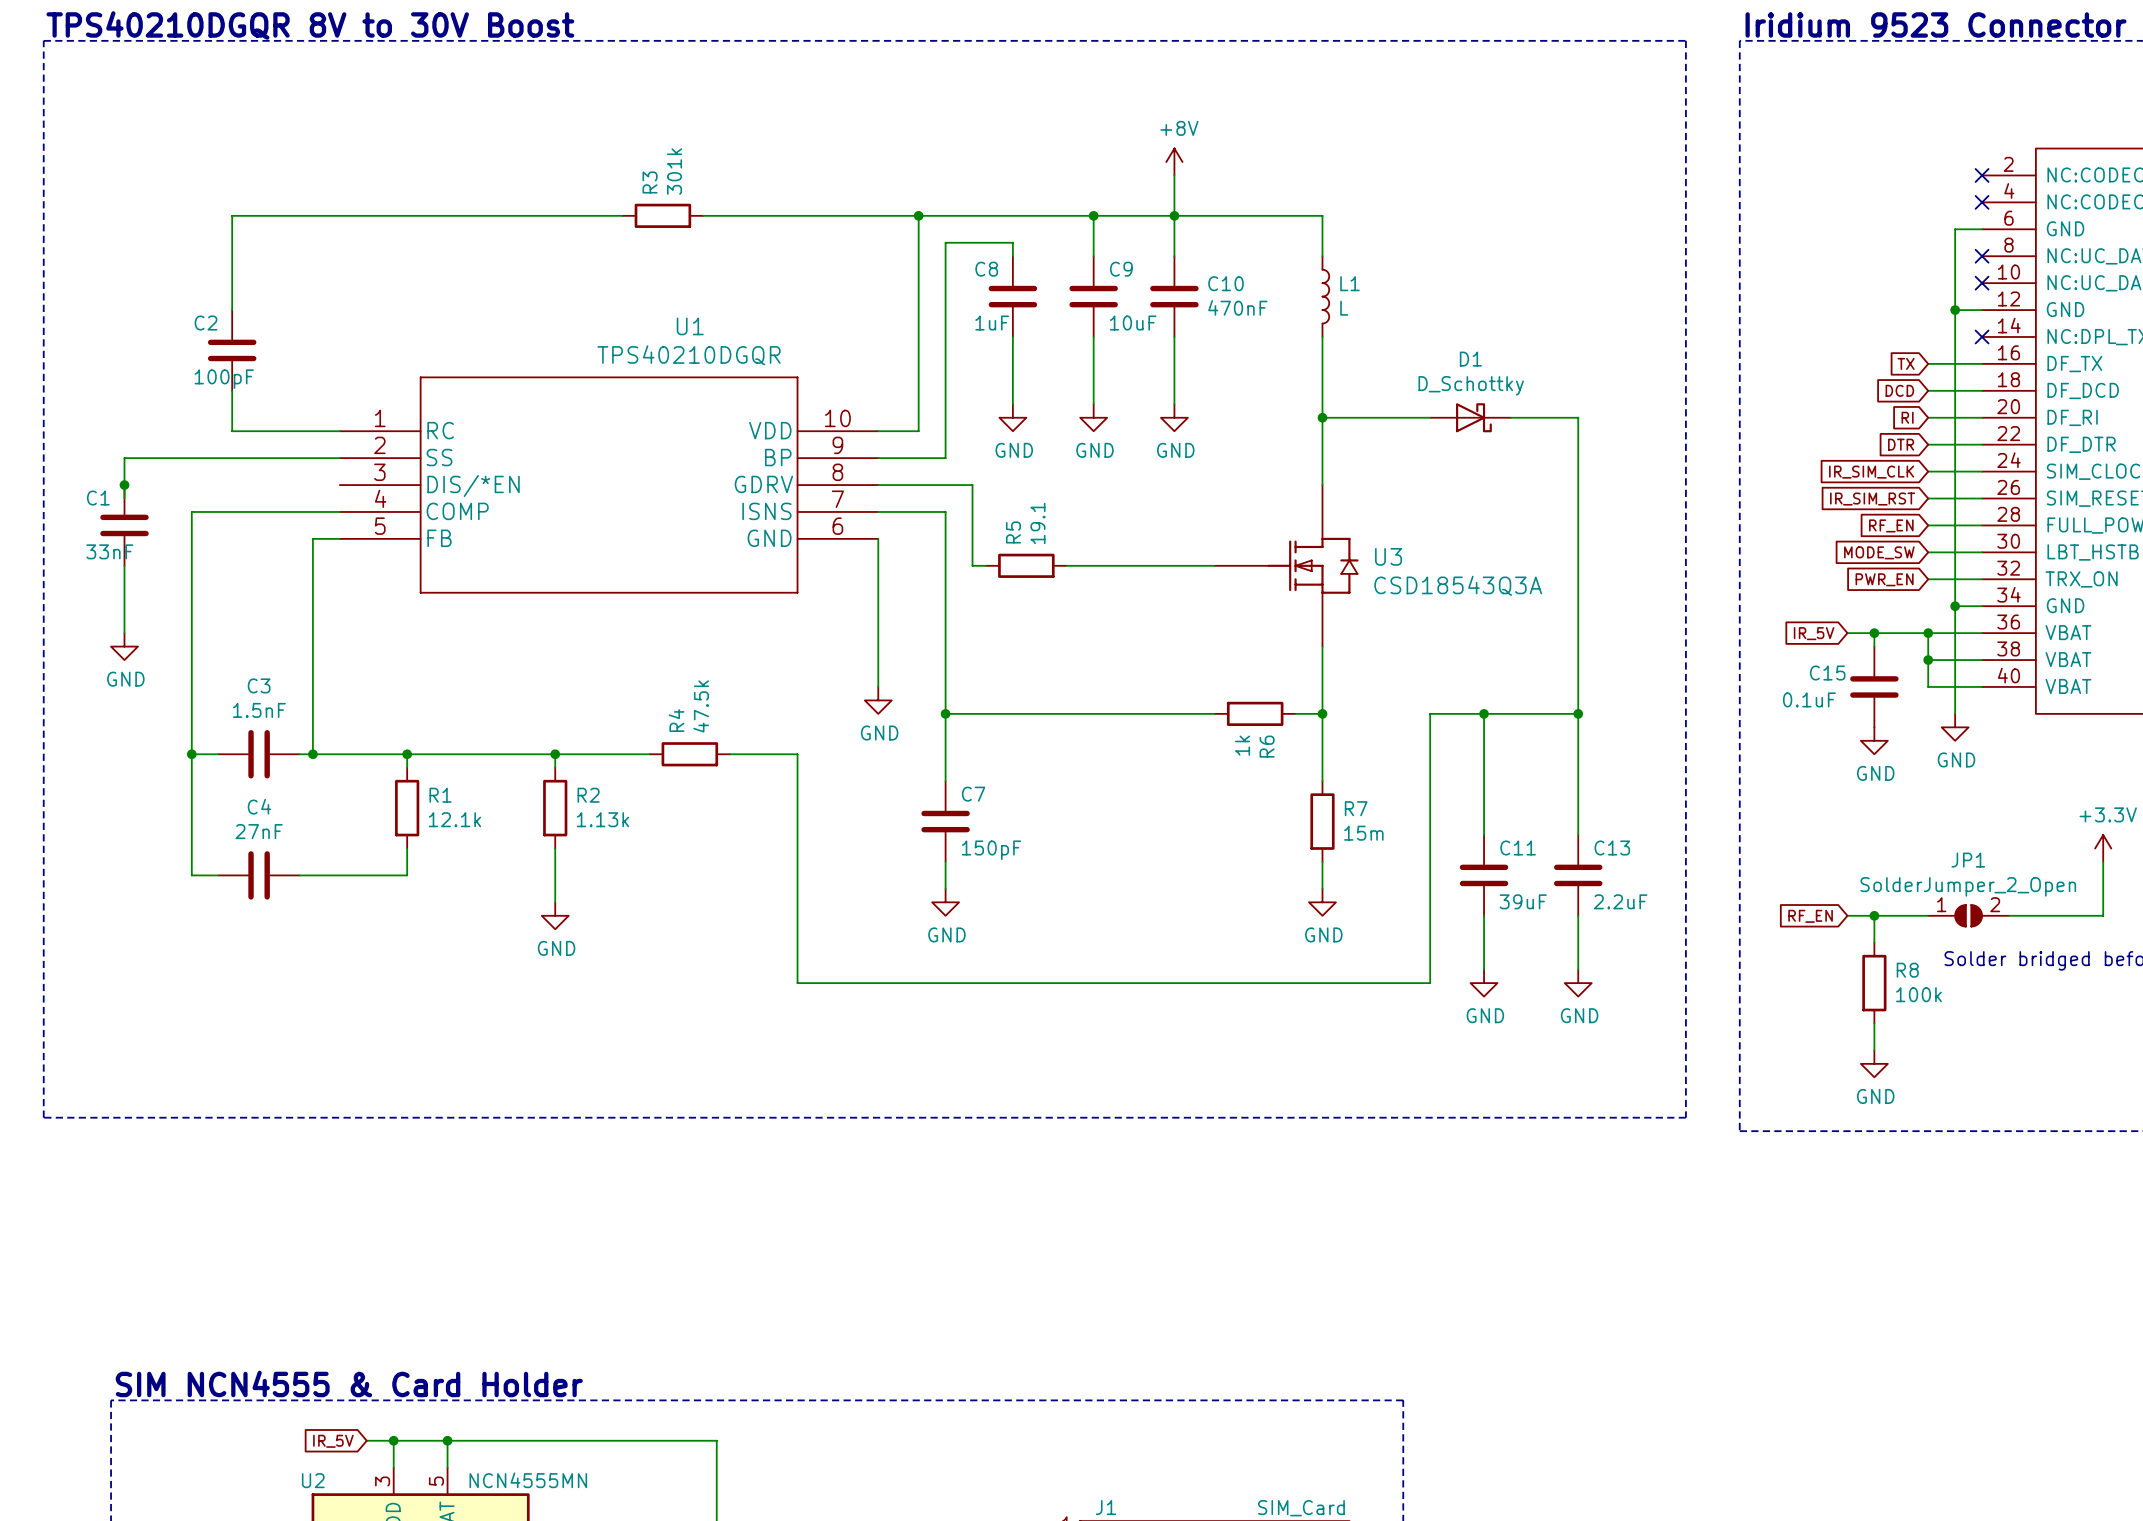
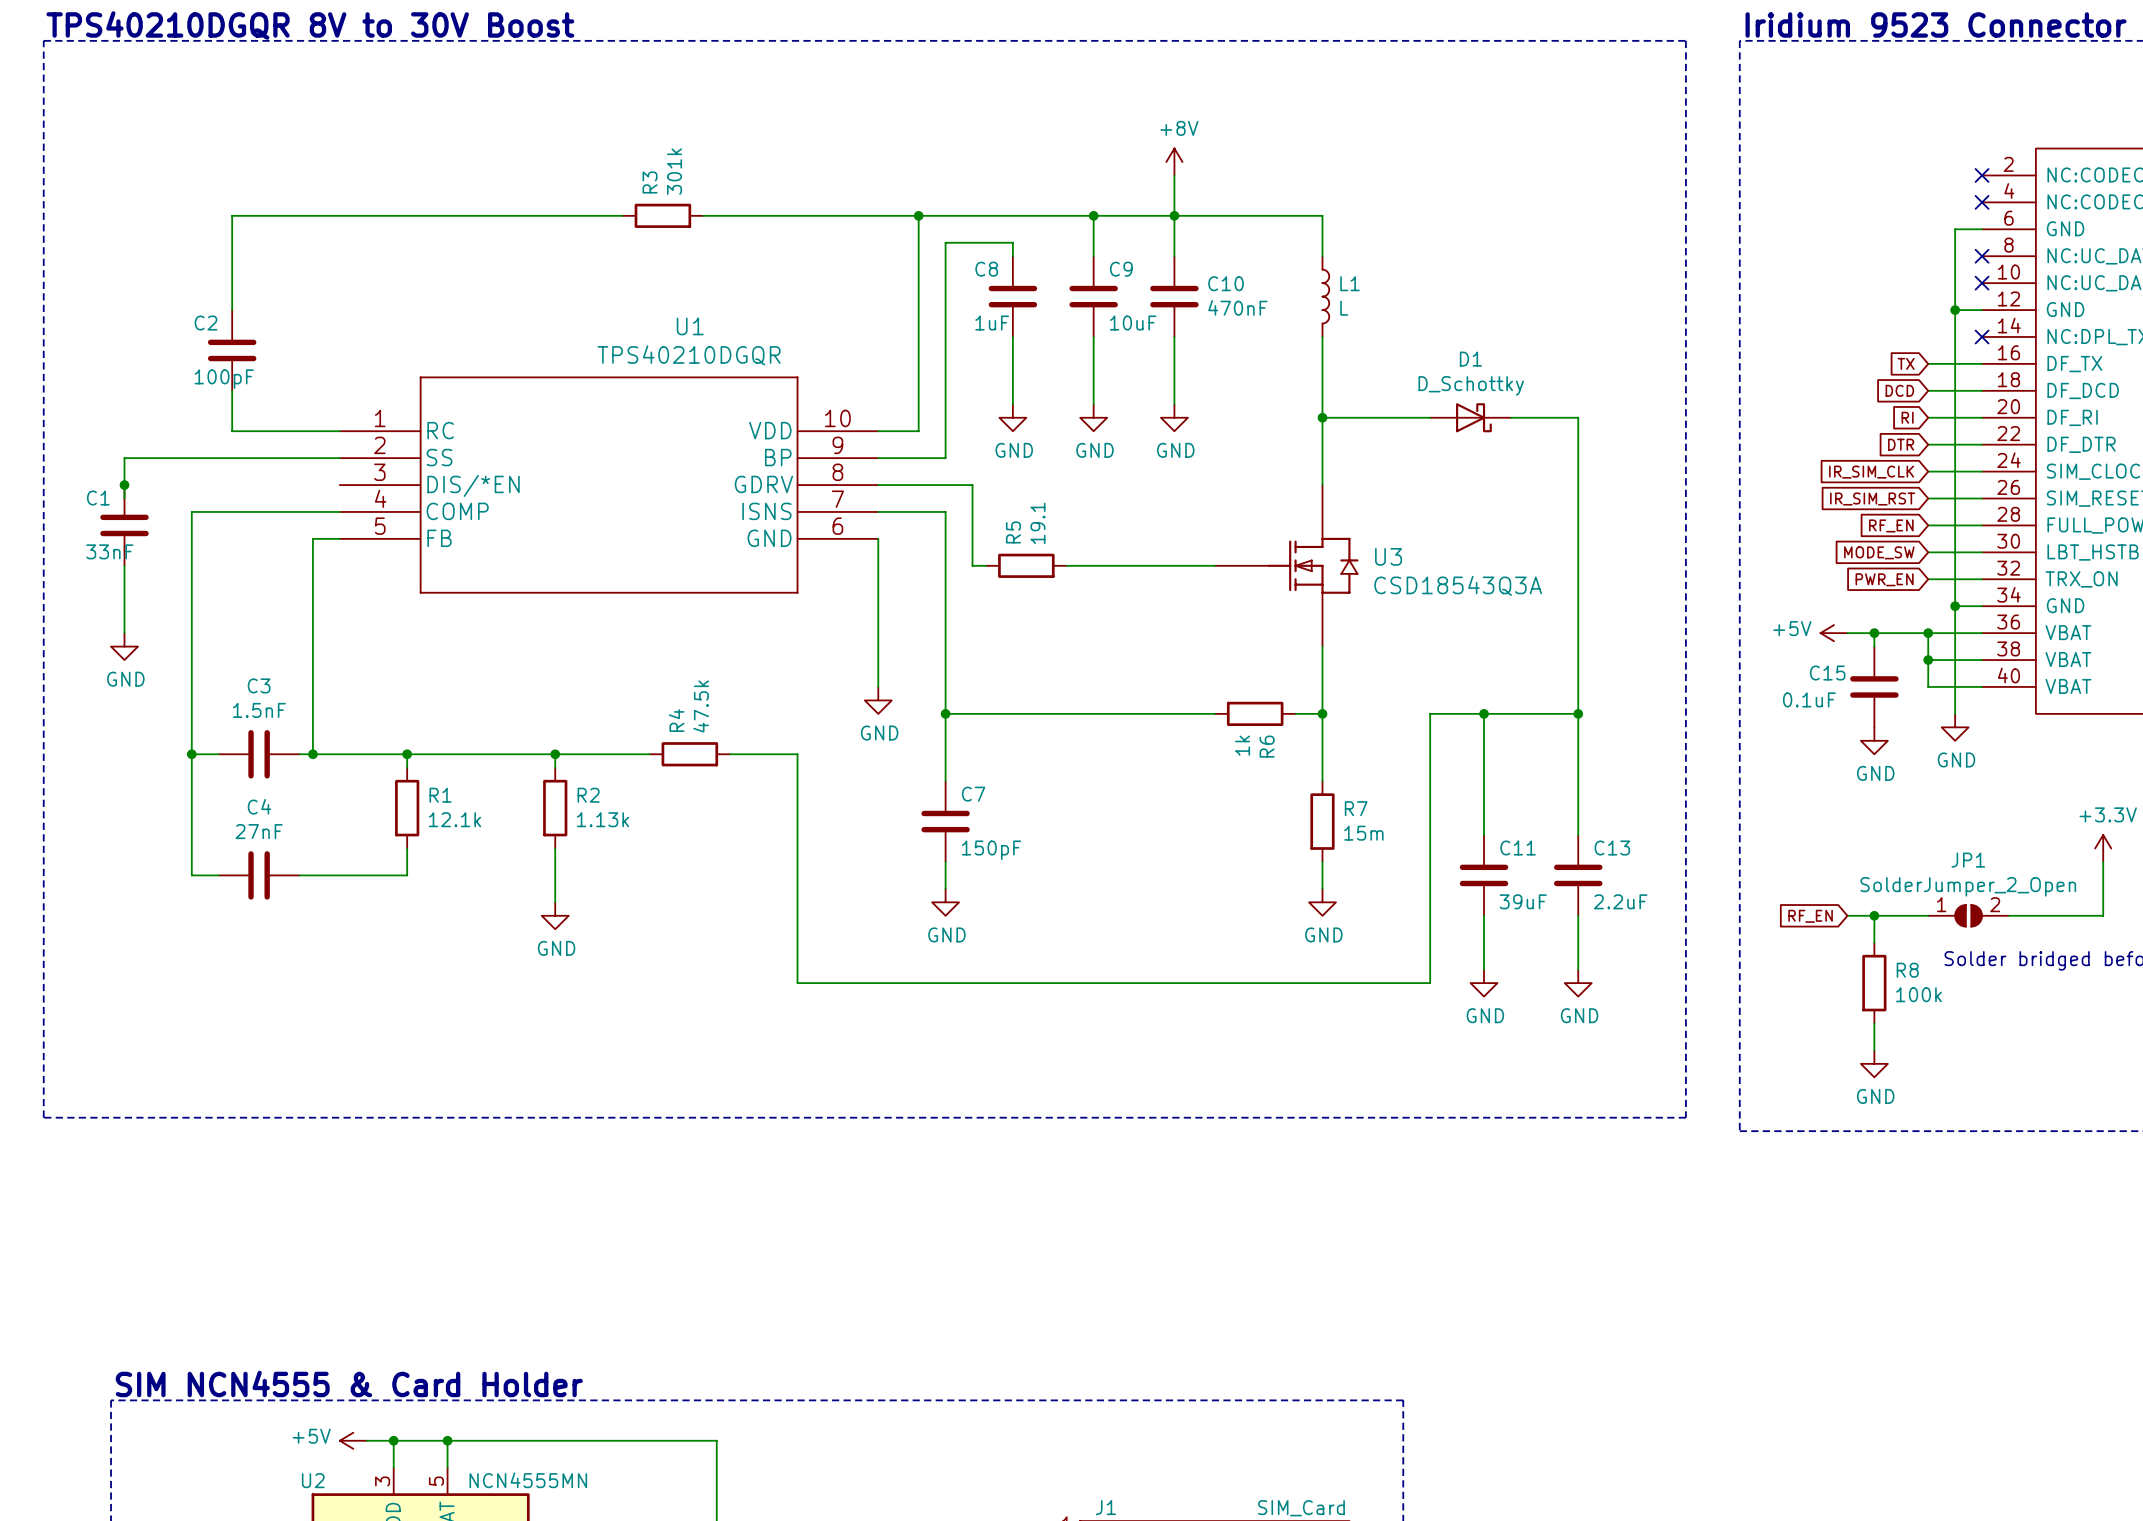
global label: IR_5V (1814, 633) -> none
power symbol: none -> +5V (1834, 633)
power symbol: none -> +5V (353, 1440)
global label: IR_5V (333, 1441) -> none

